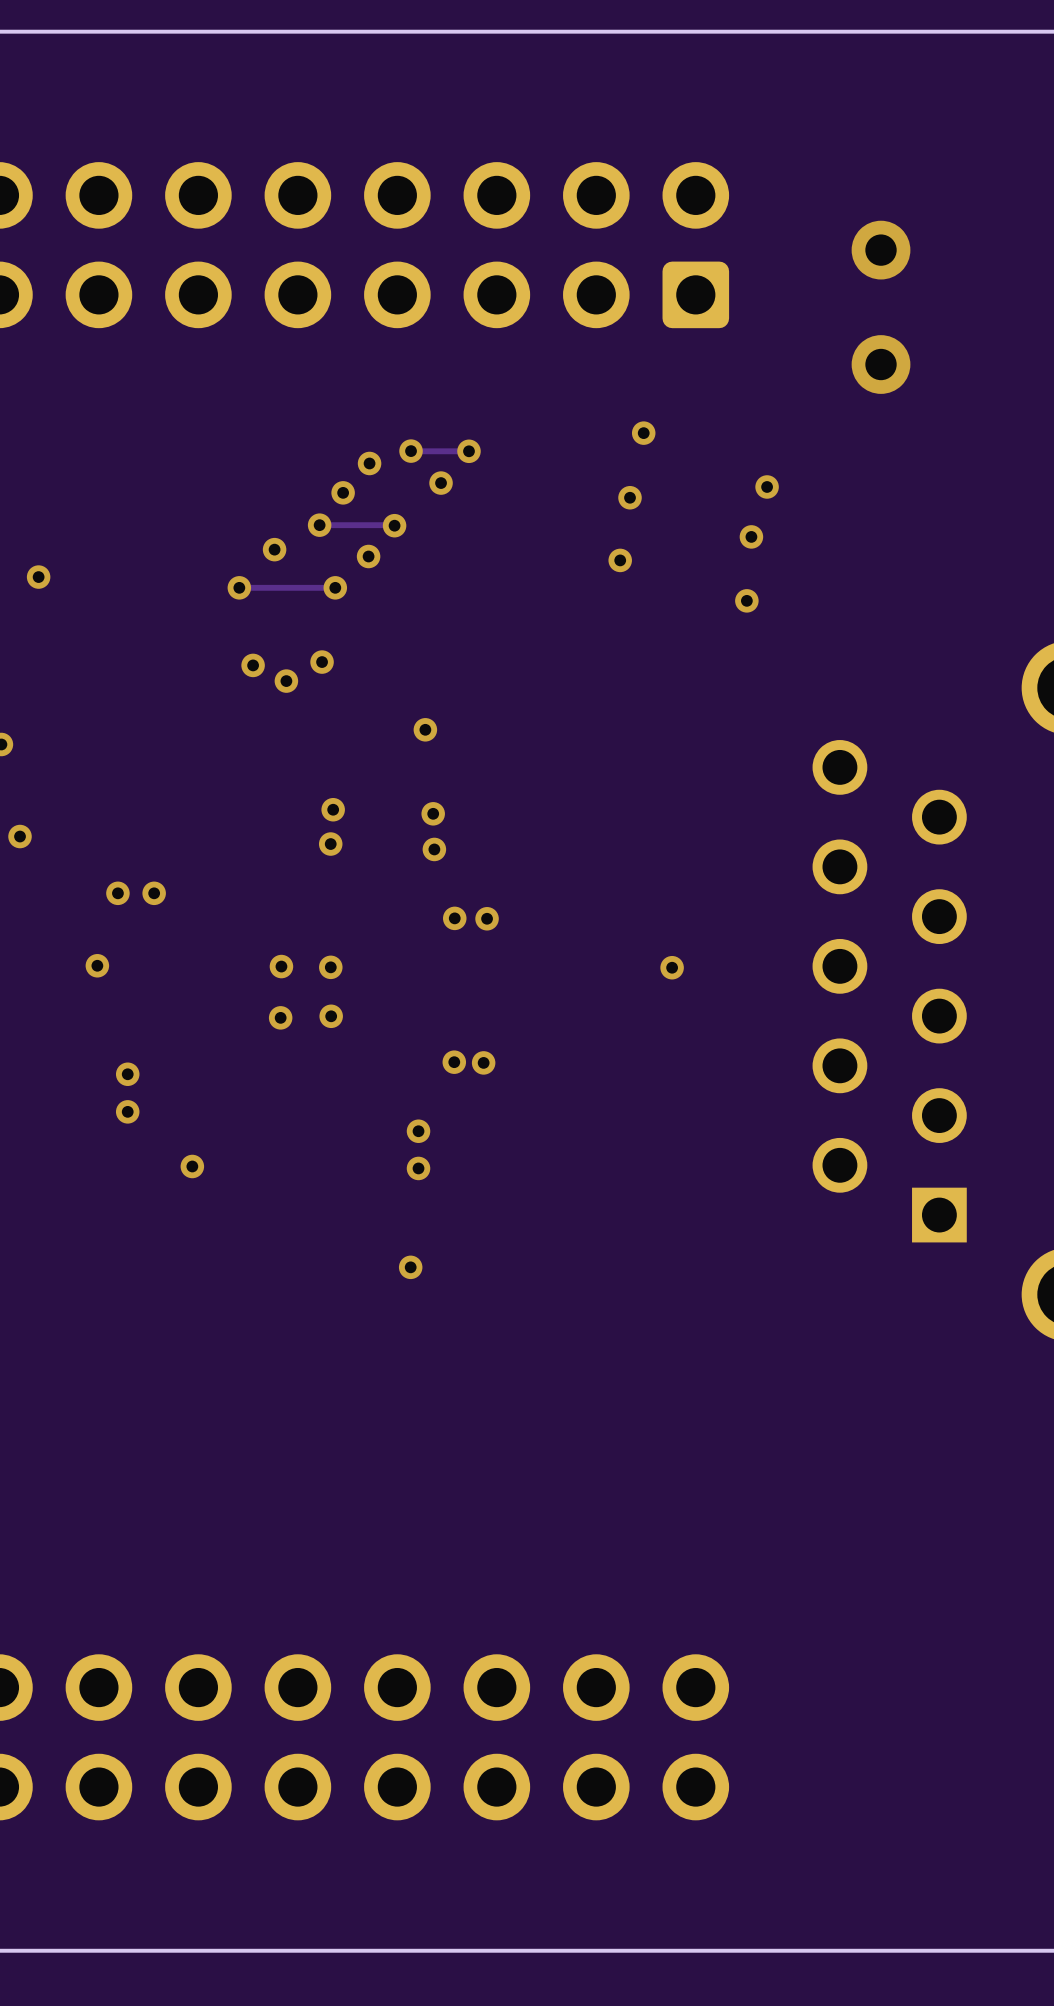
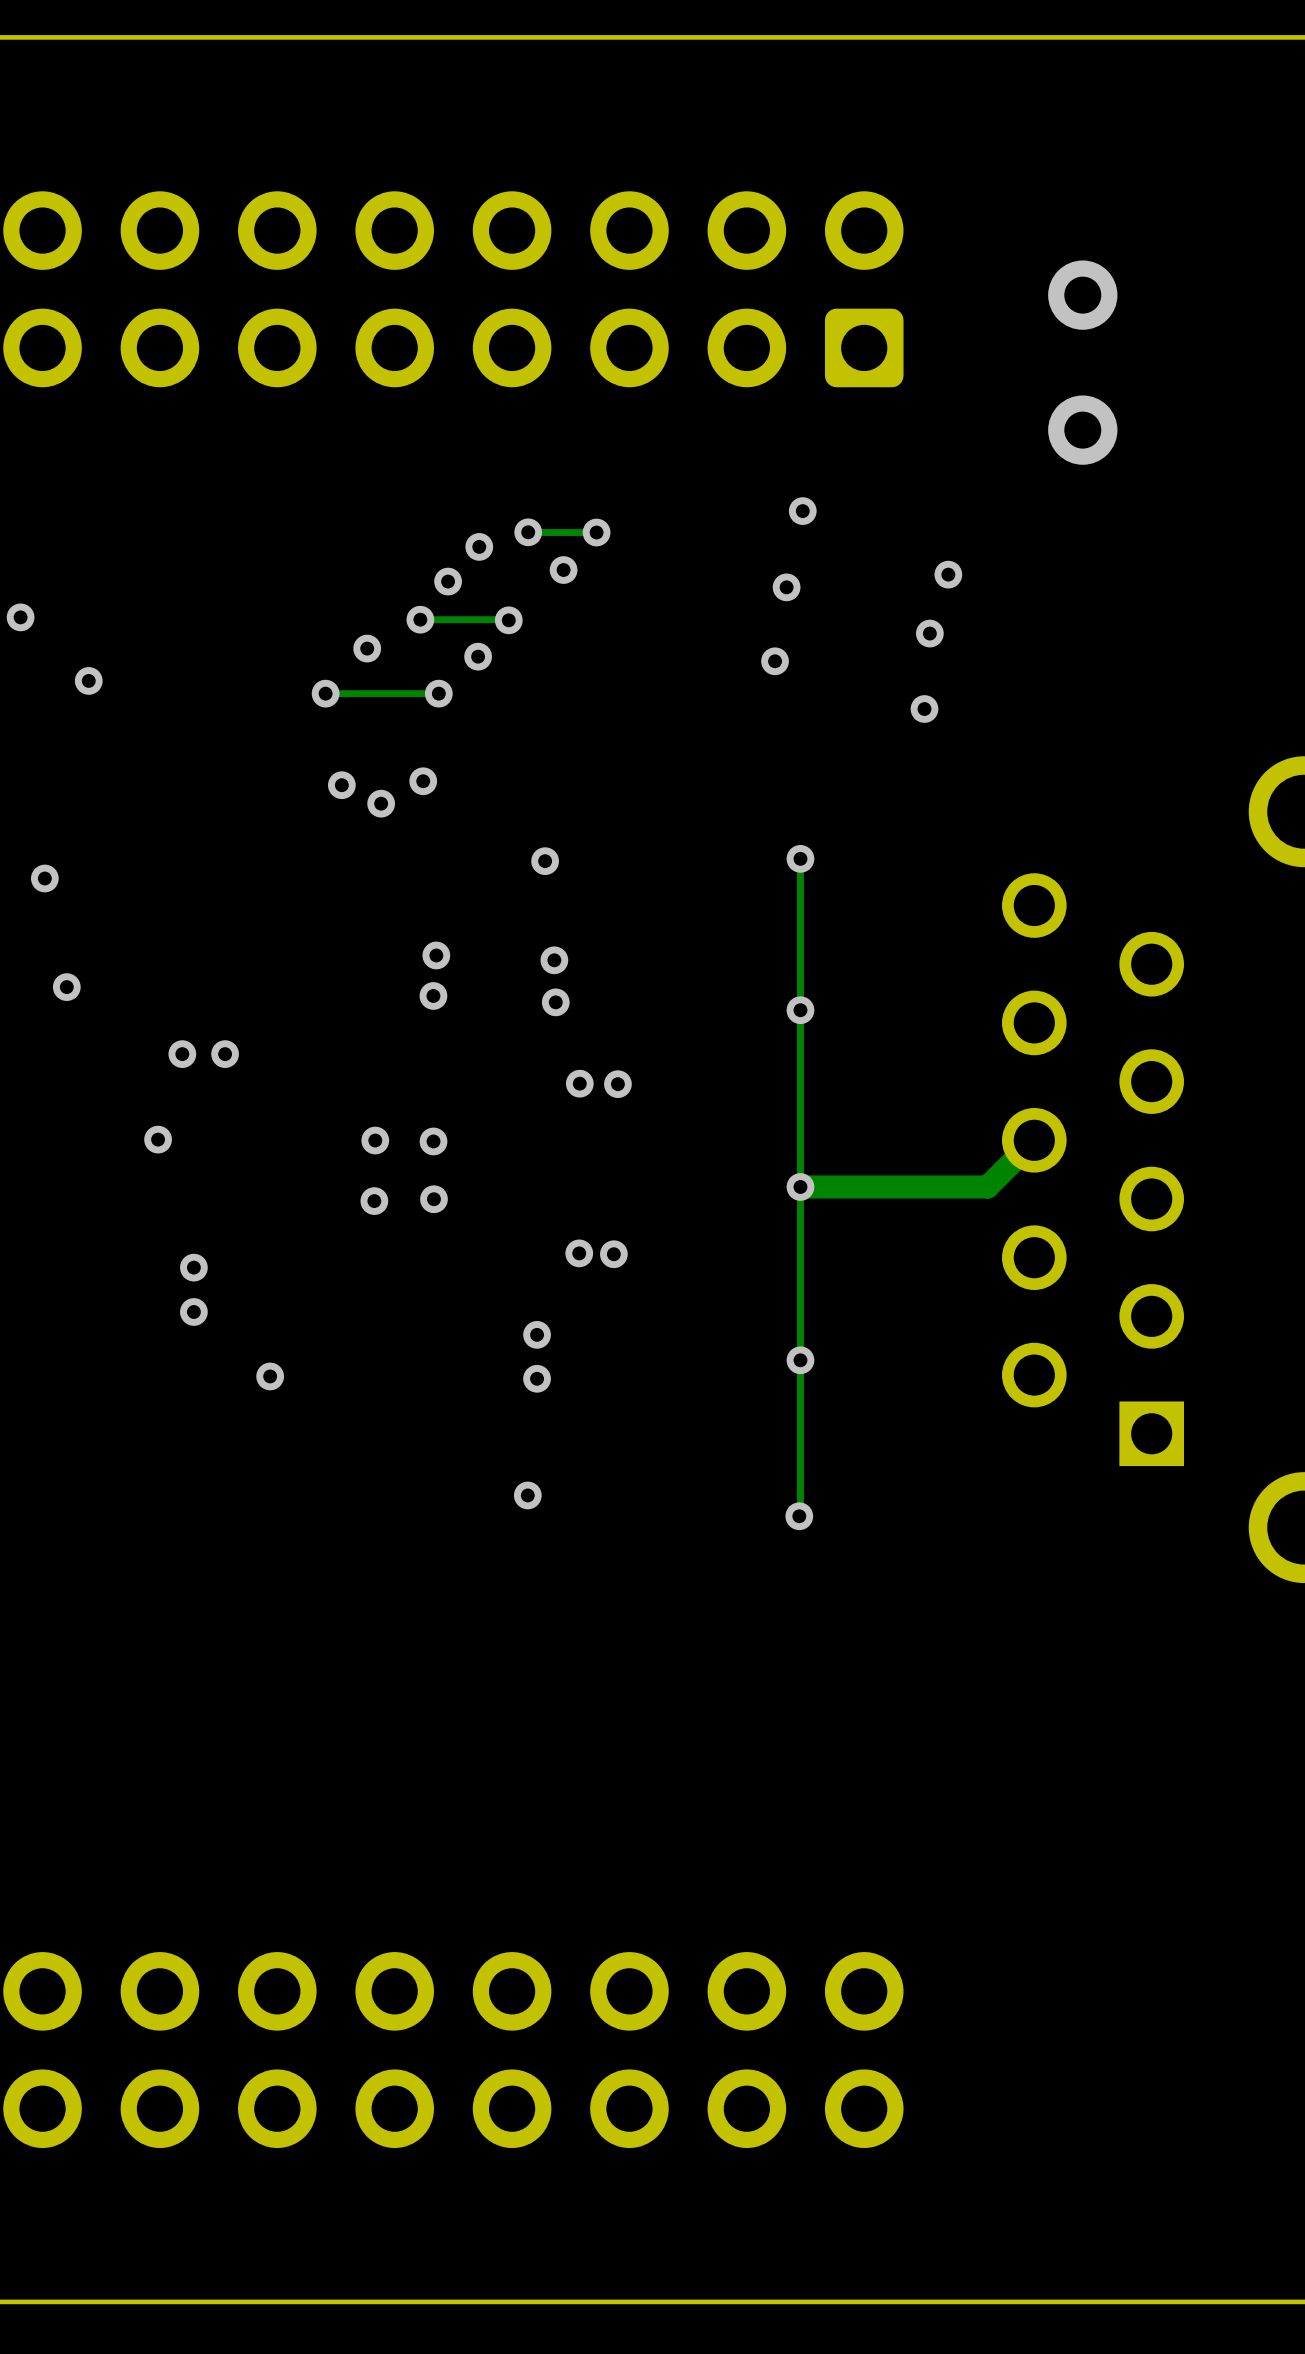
track: none -> (800, 858) (799, 1516)
via: none -> (800, 858)
via: none -> (800, 1010)
track: none -> (1034, 1140) (987, 1186) (800, 1186)
via position: (672, 967) -> (800, 1186)
via: none -> (800, 1360)
via: none -> (799, 1516)

